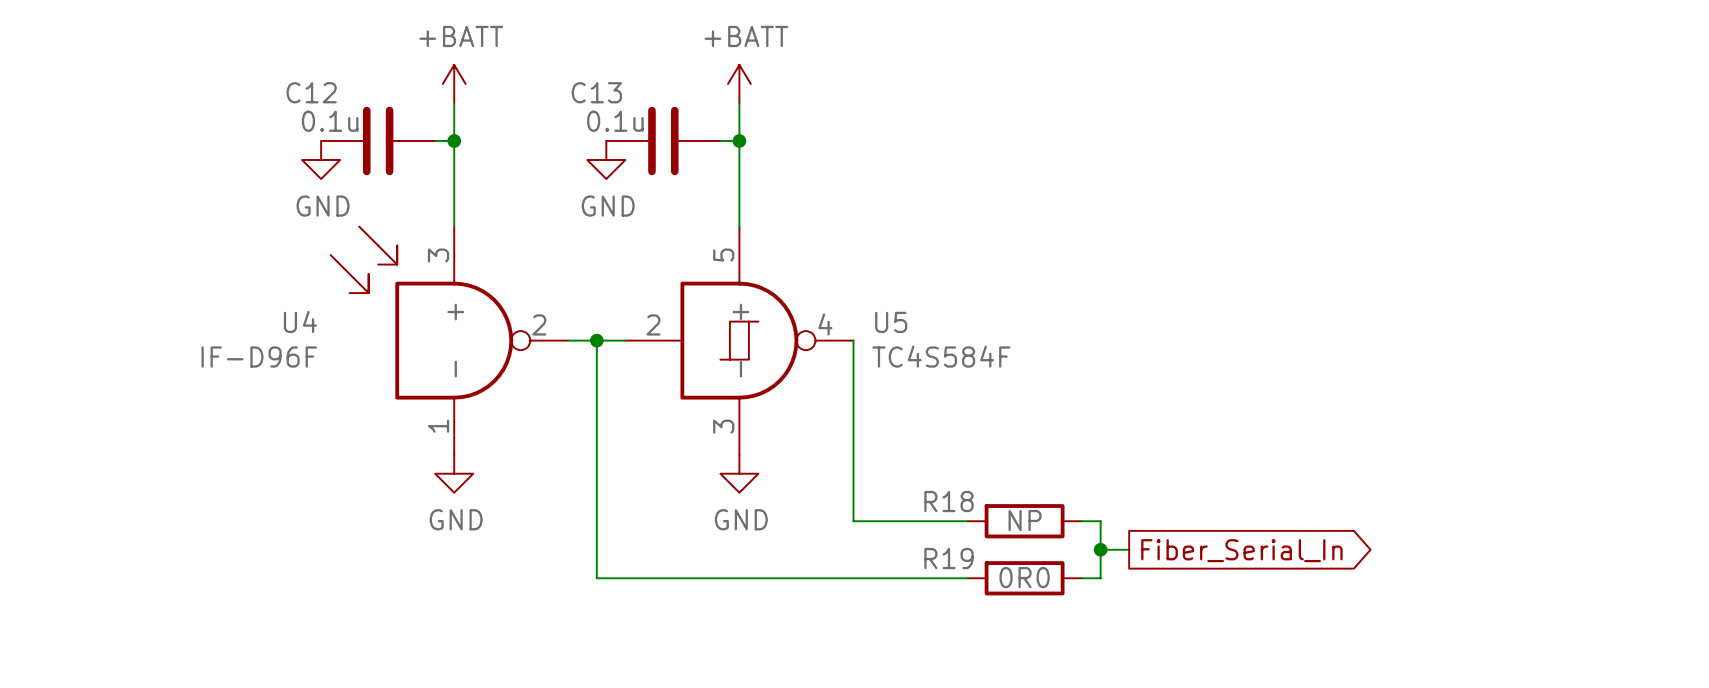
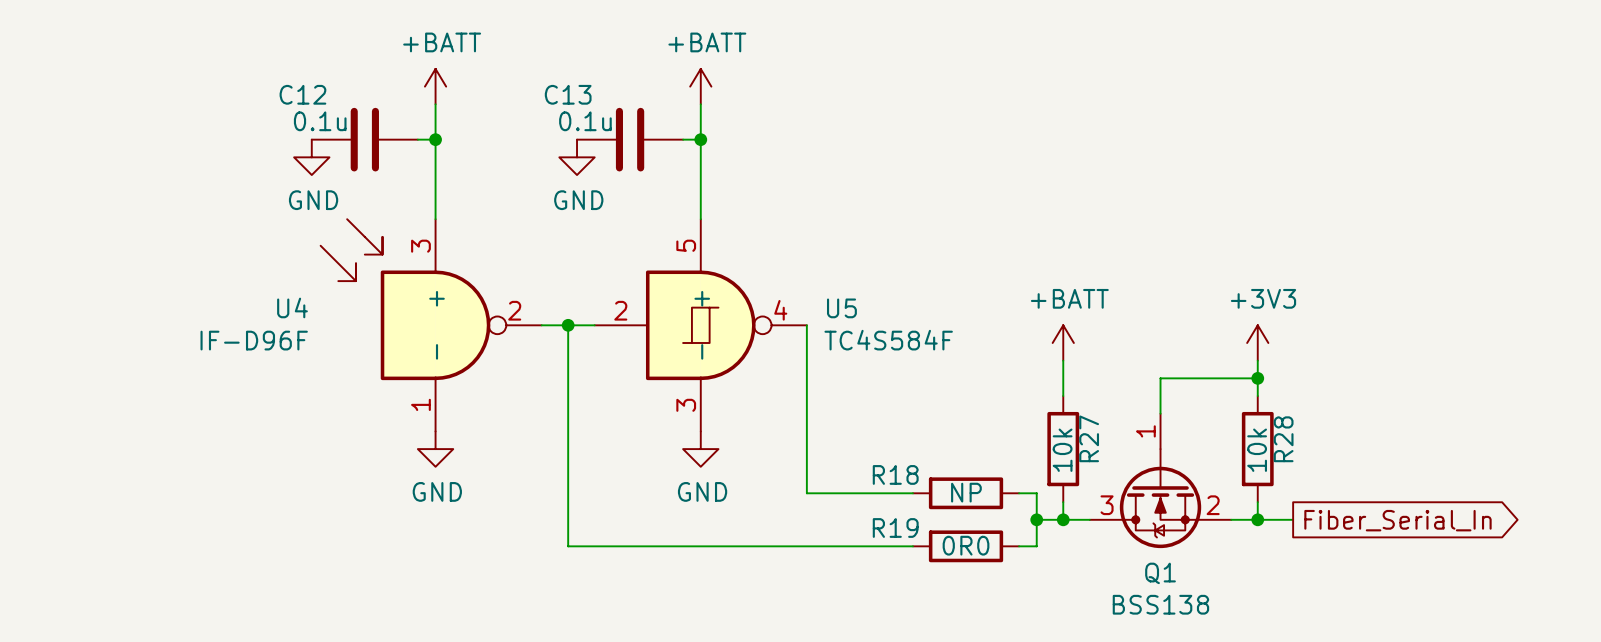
power symbol: none -> +BATT (1063, 342)
power symbol: none -> +3V3 (1257, 342)
wire: none -> (1063, 360) (1063, 396)
wire: none -> (1257, 360) (1257, 396)
wire: none -> (1257, 378) (1160, 378) (1160, 413)
junction: none -> (1257, 378)
R27: none -> 10k (1063, 449)
R28: none -> 10k (1257, 449)
Q1: none -> BSS138 (1160, 480)
wire: none -> (1257, 502) (1257, 519)
junction: none -> (1063, 519)
wire: none -> (1231, 519) (1293, 519)
junction: none -> (1257, 519)
global label position: Fiber_Serial_In (1241, 550) -> Fiber_Serial_In (1397, 520)

